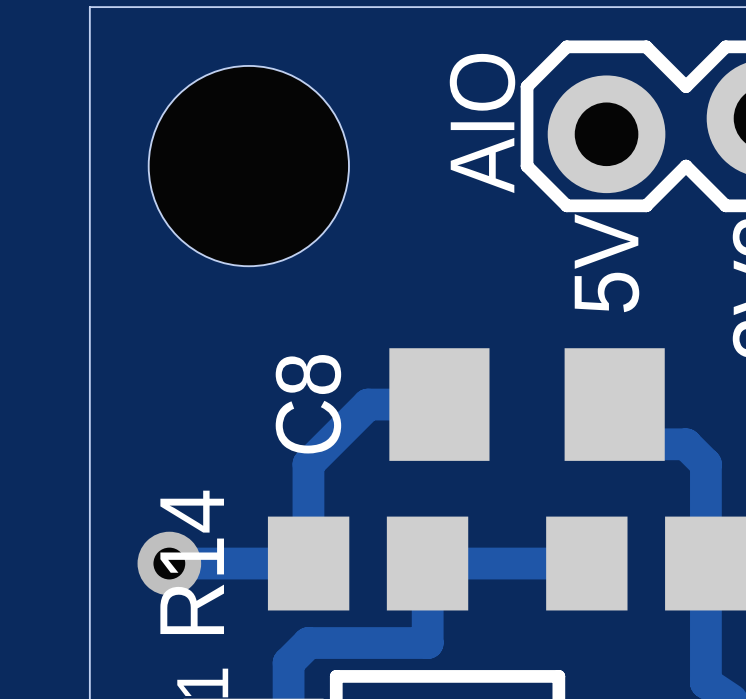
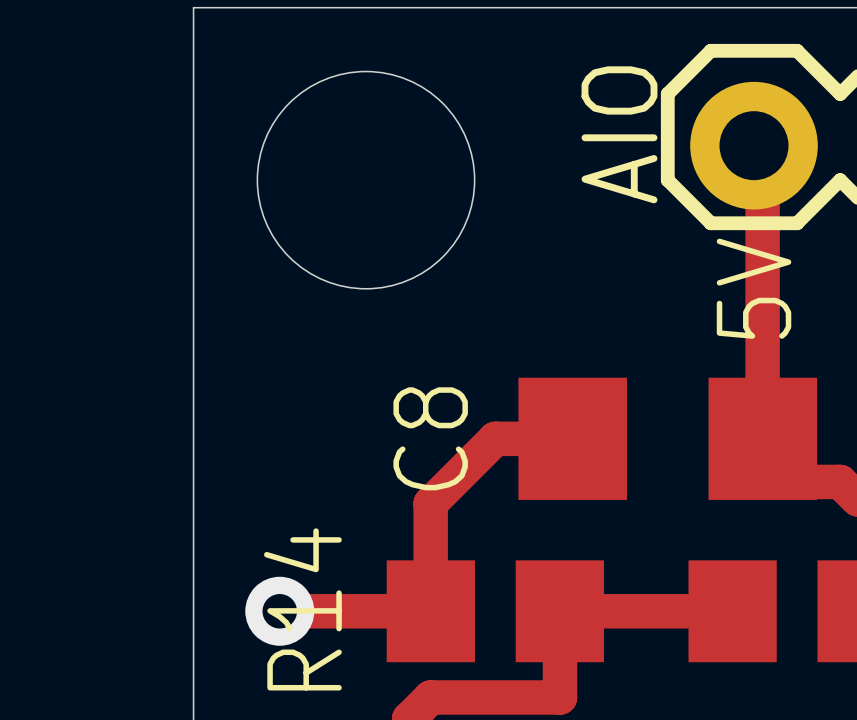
track: none -> (754, 145) (762, 145) (762, 438)

